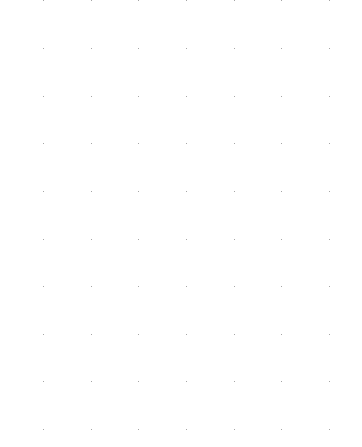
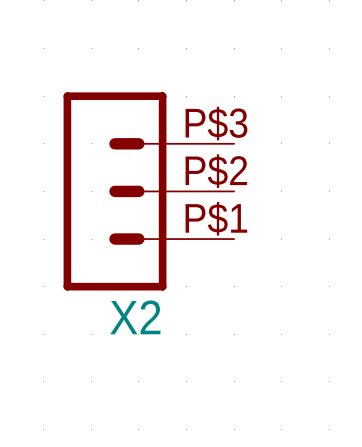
X2: none -> (148, 191)

